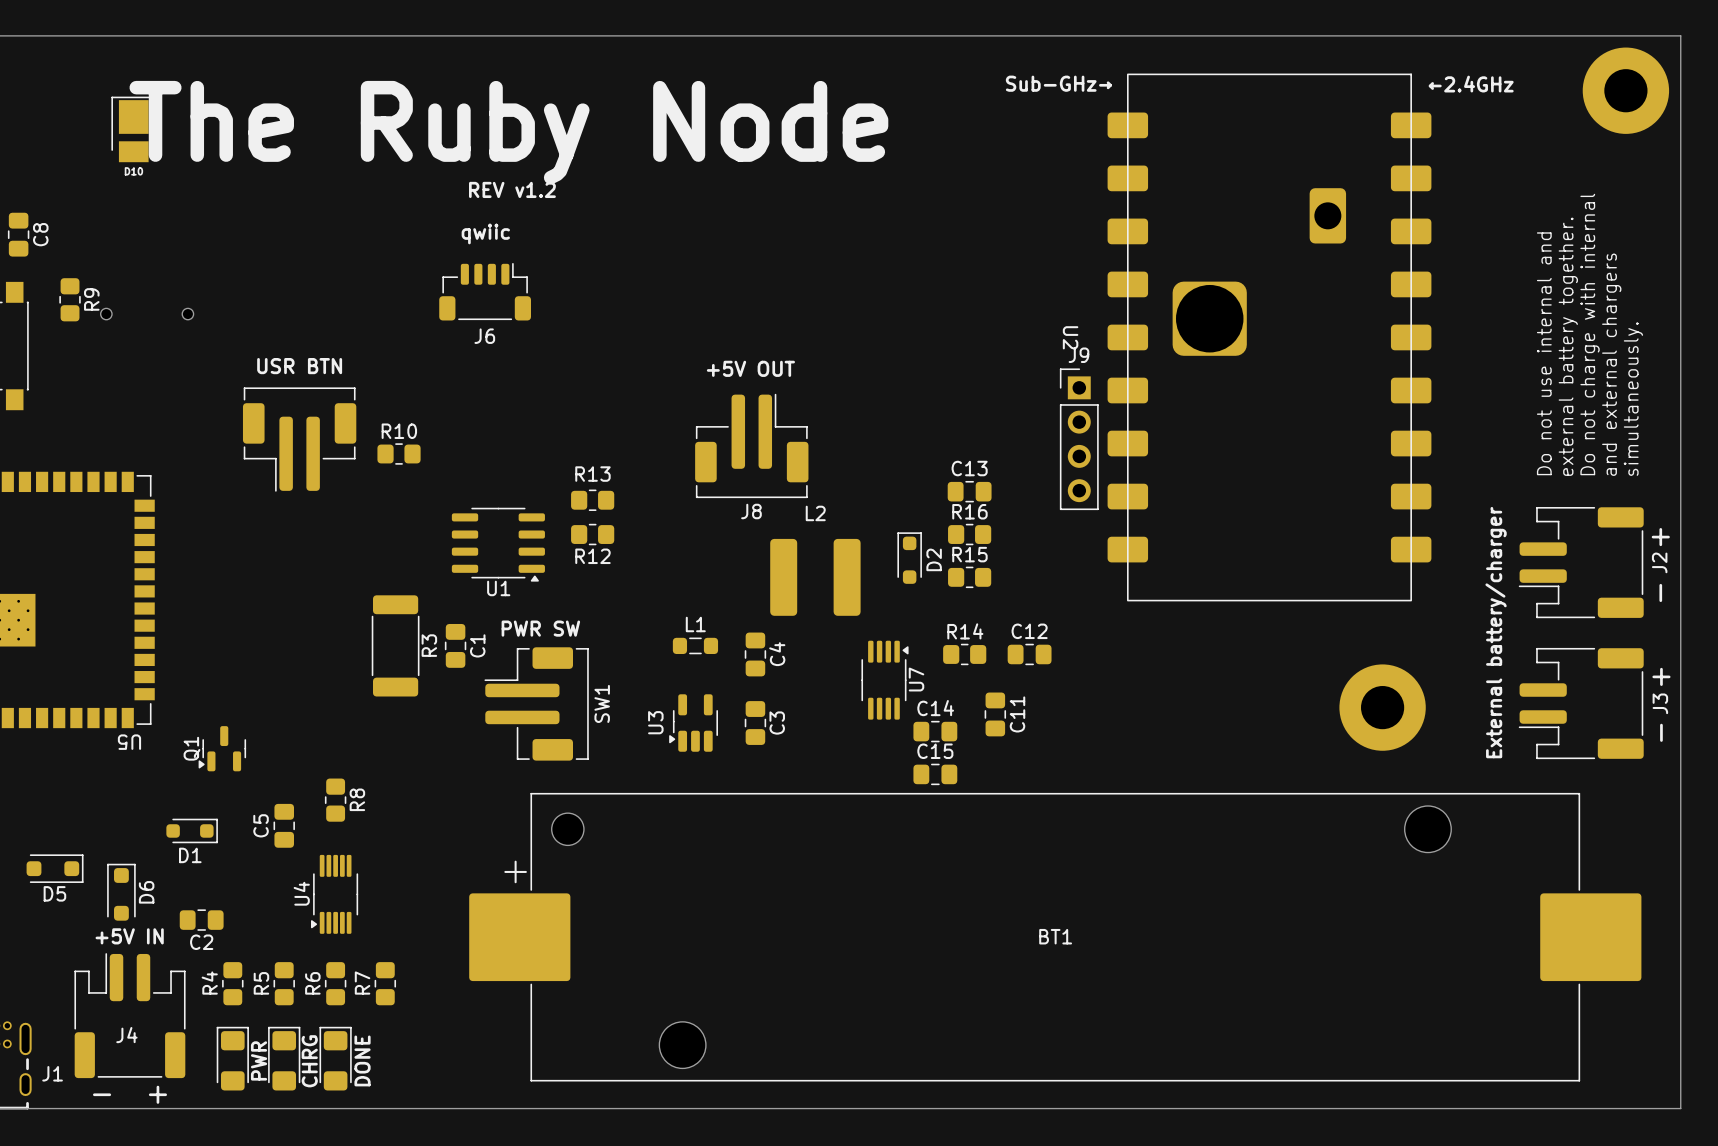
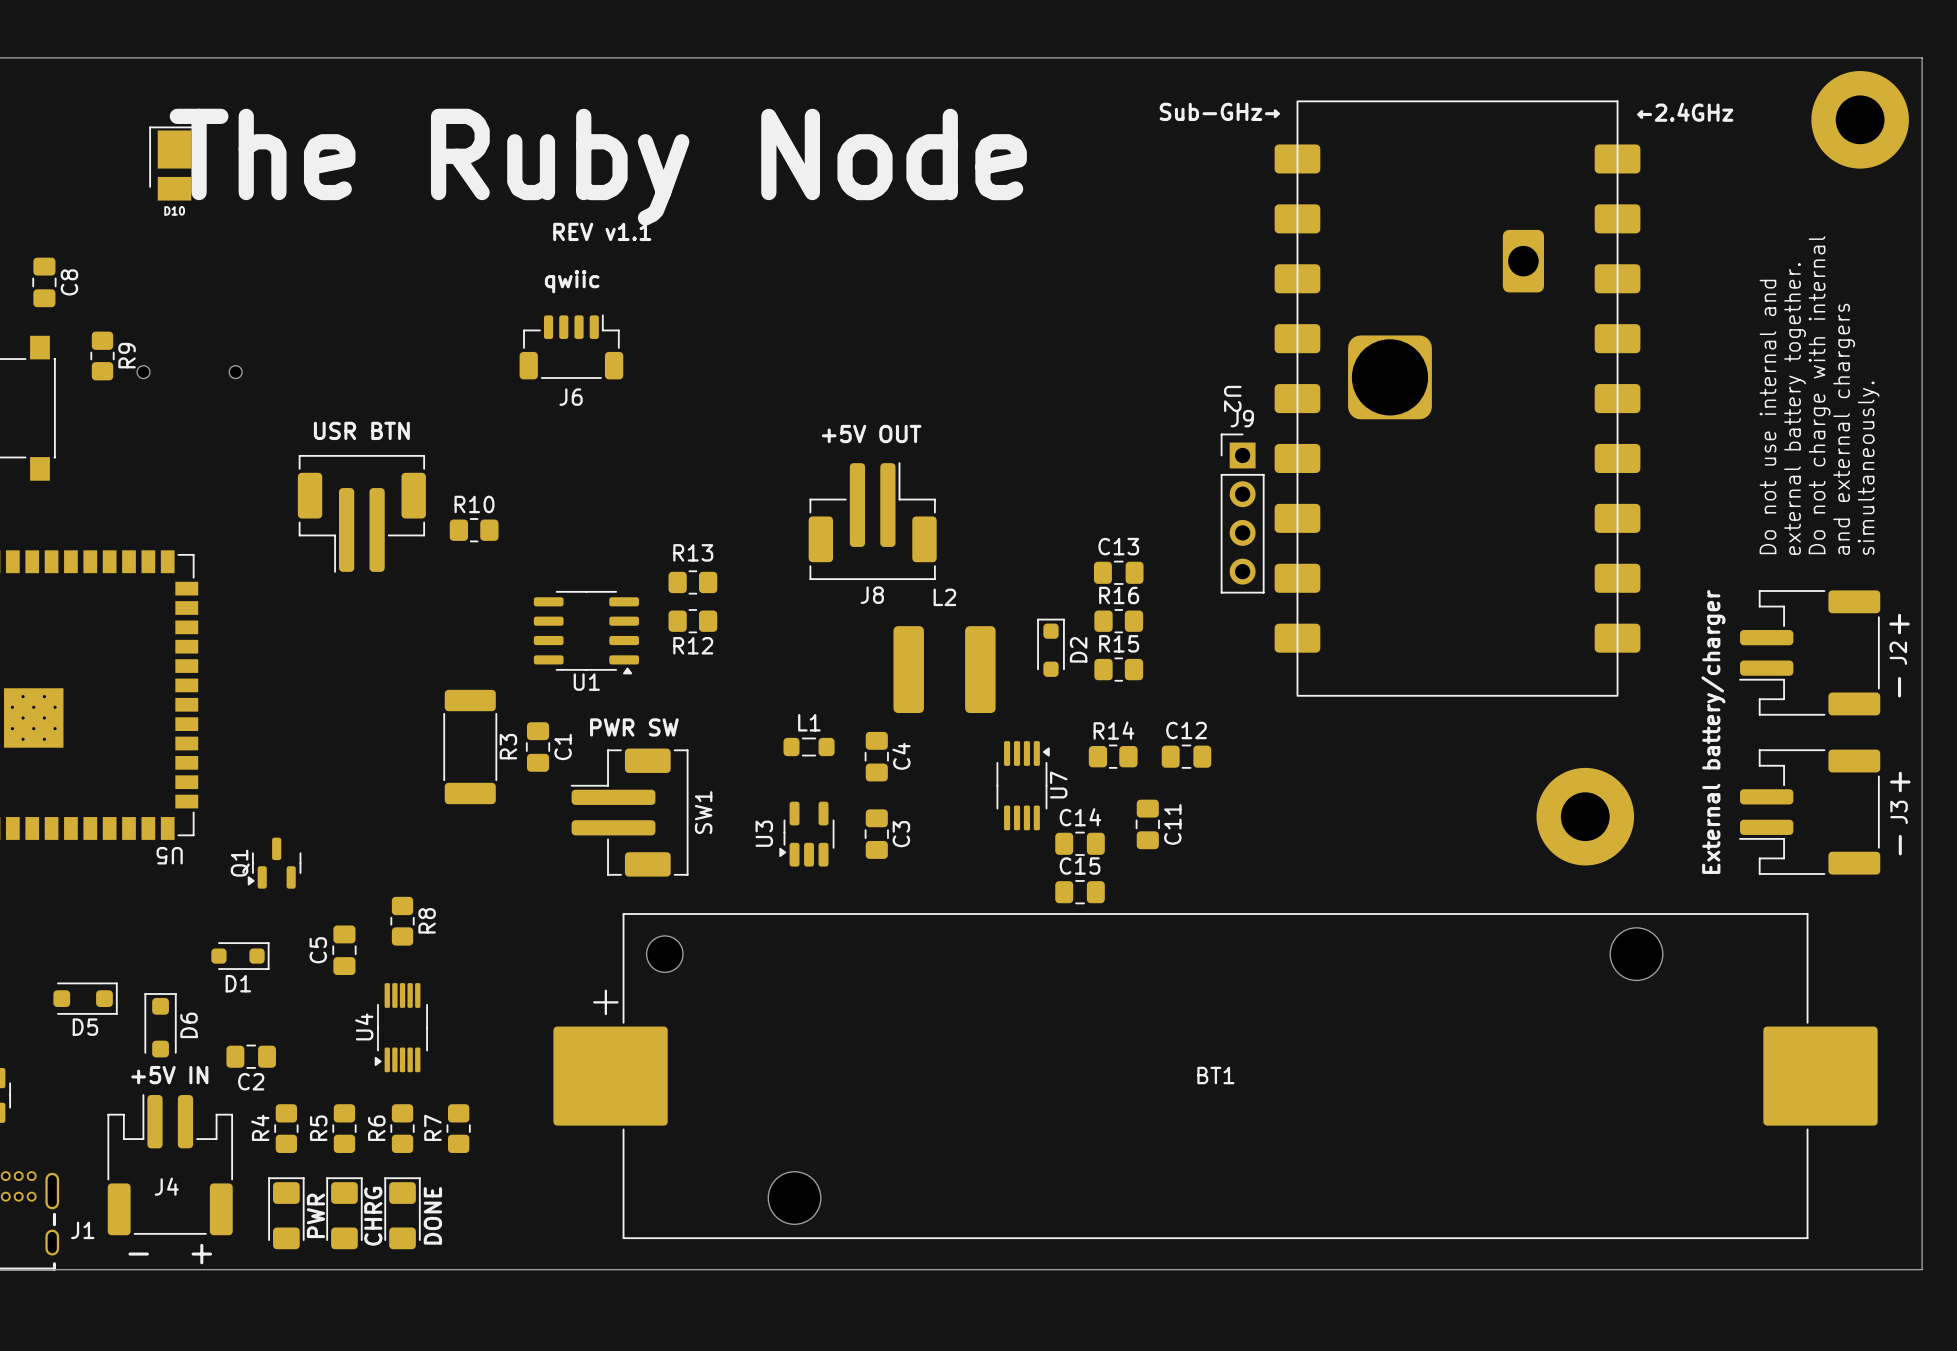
text: REV v1.2 (512, 189) -> REV v1.1 (602, 231)

